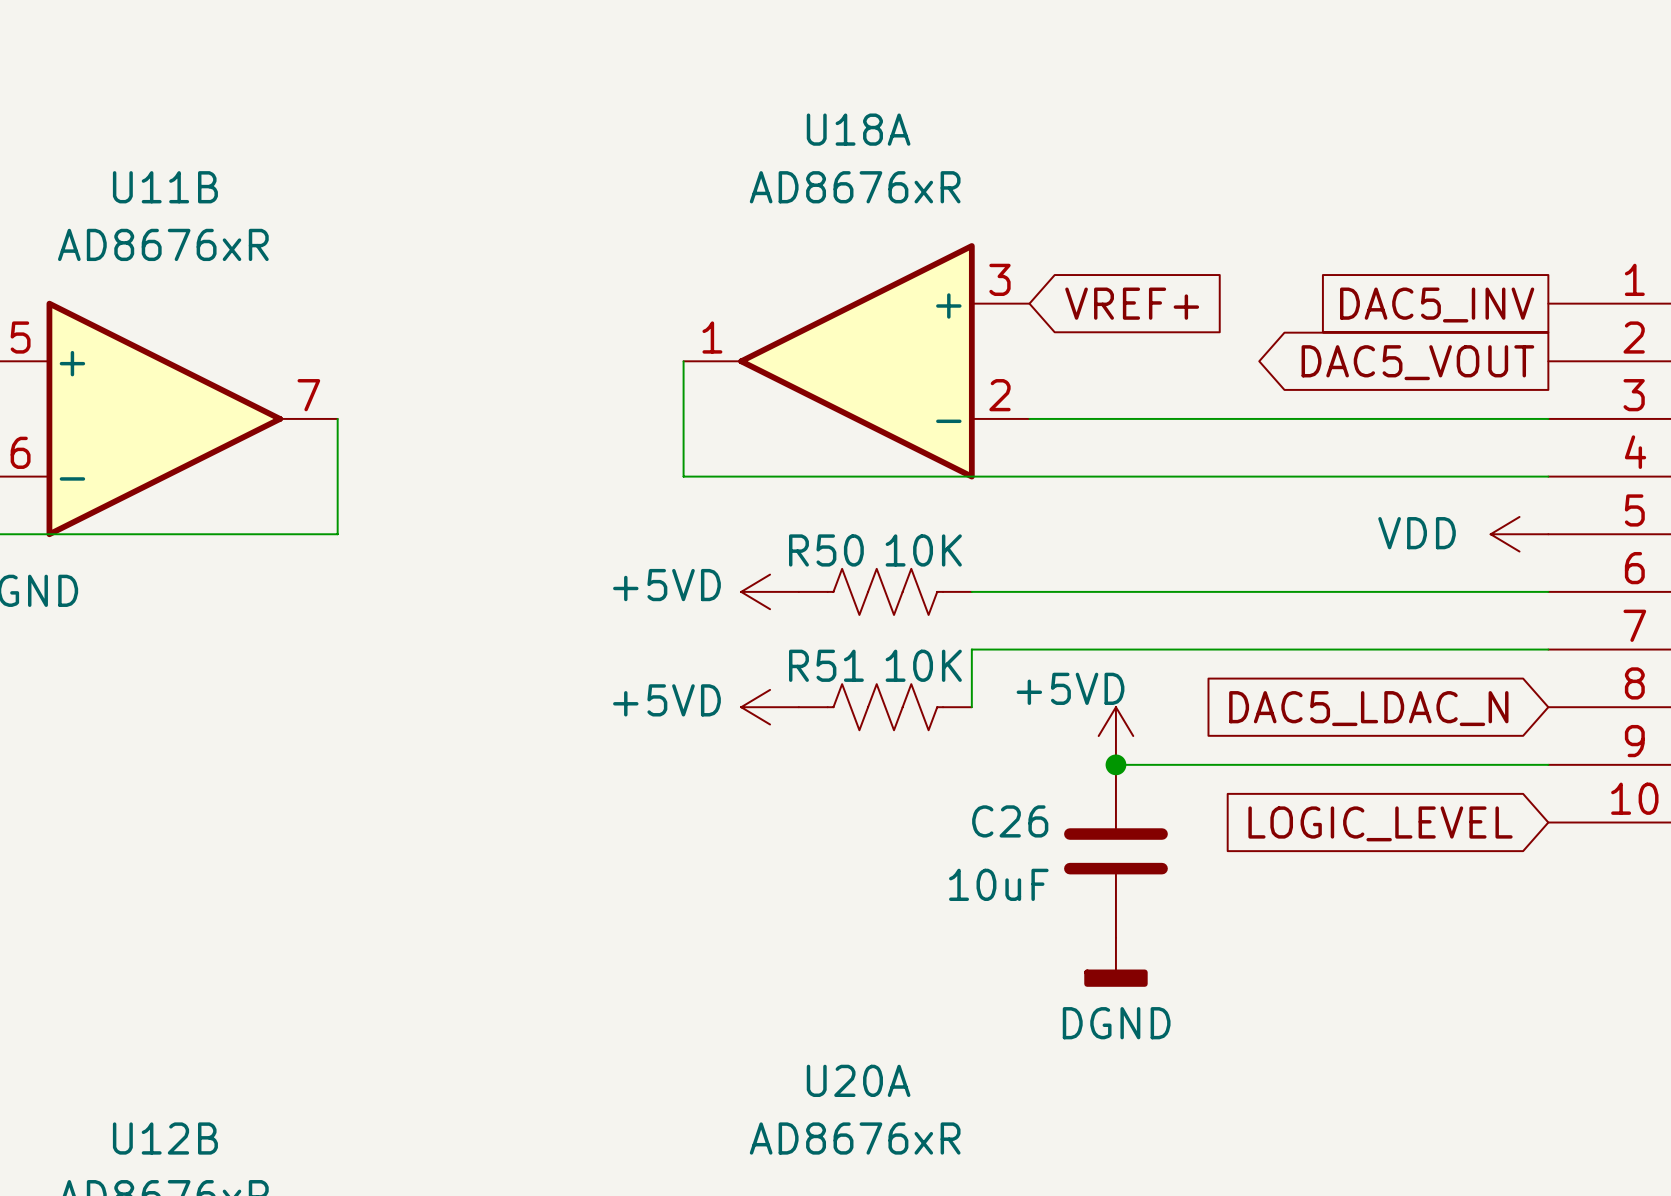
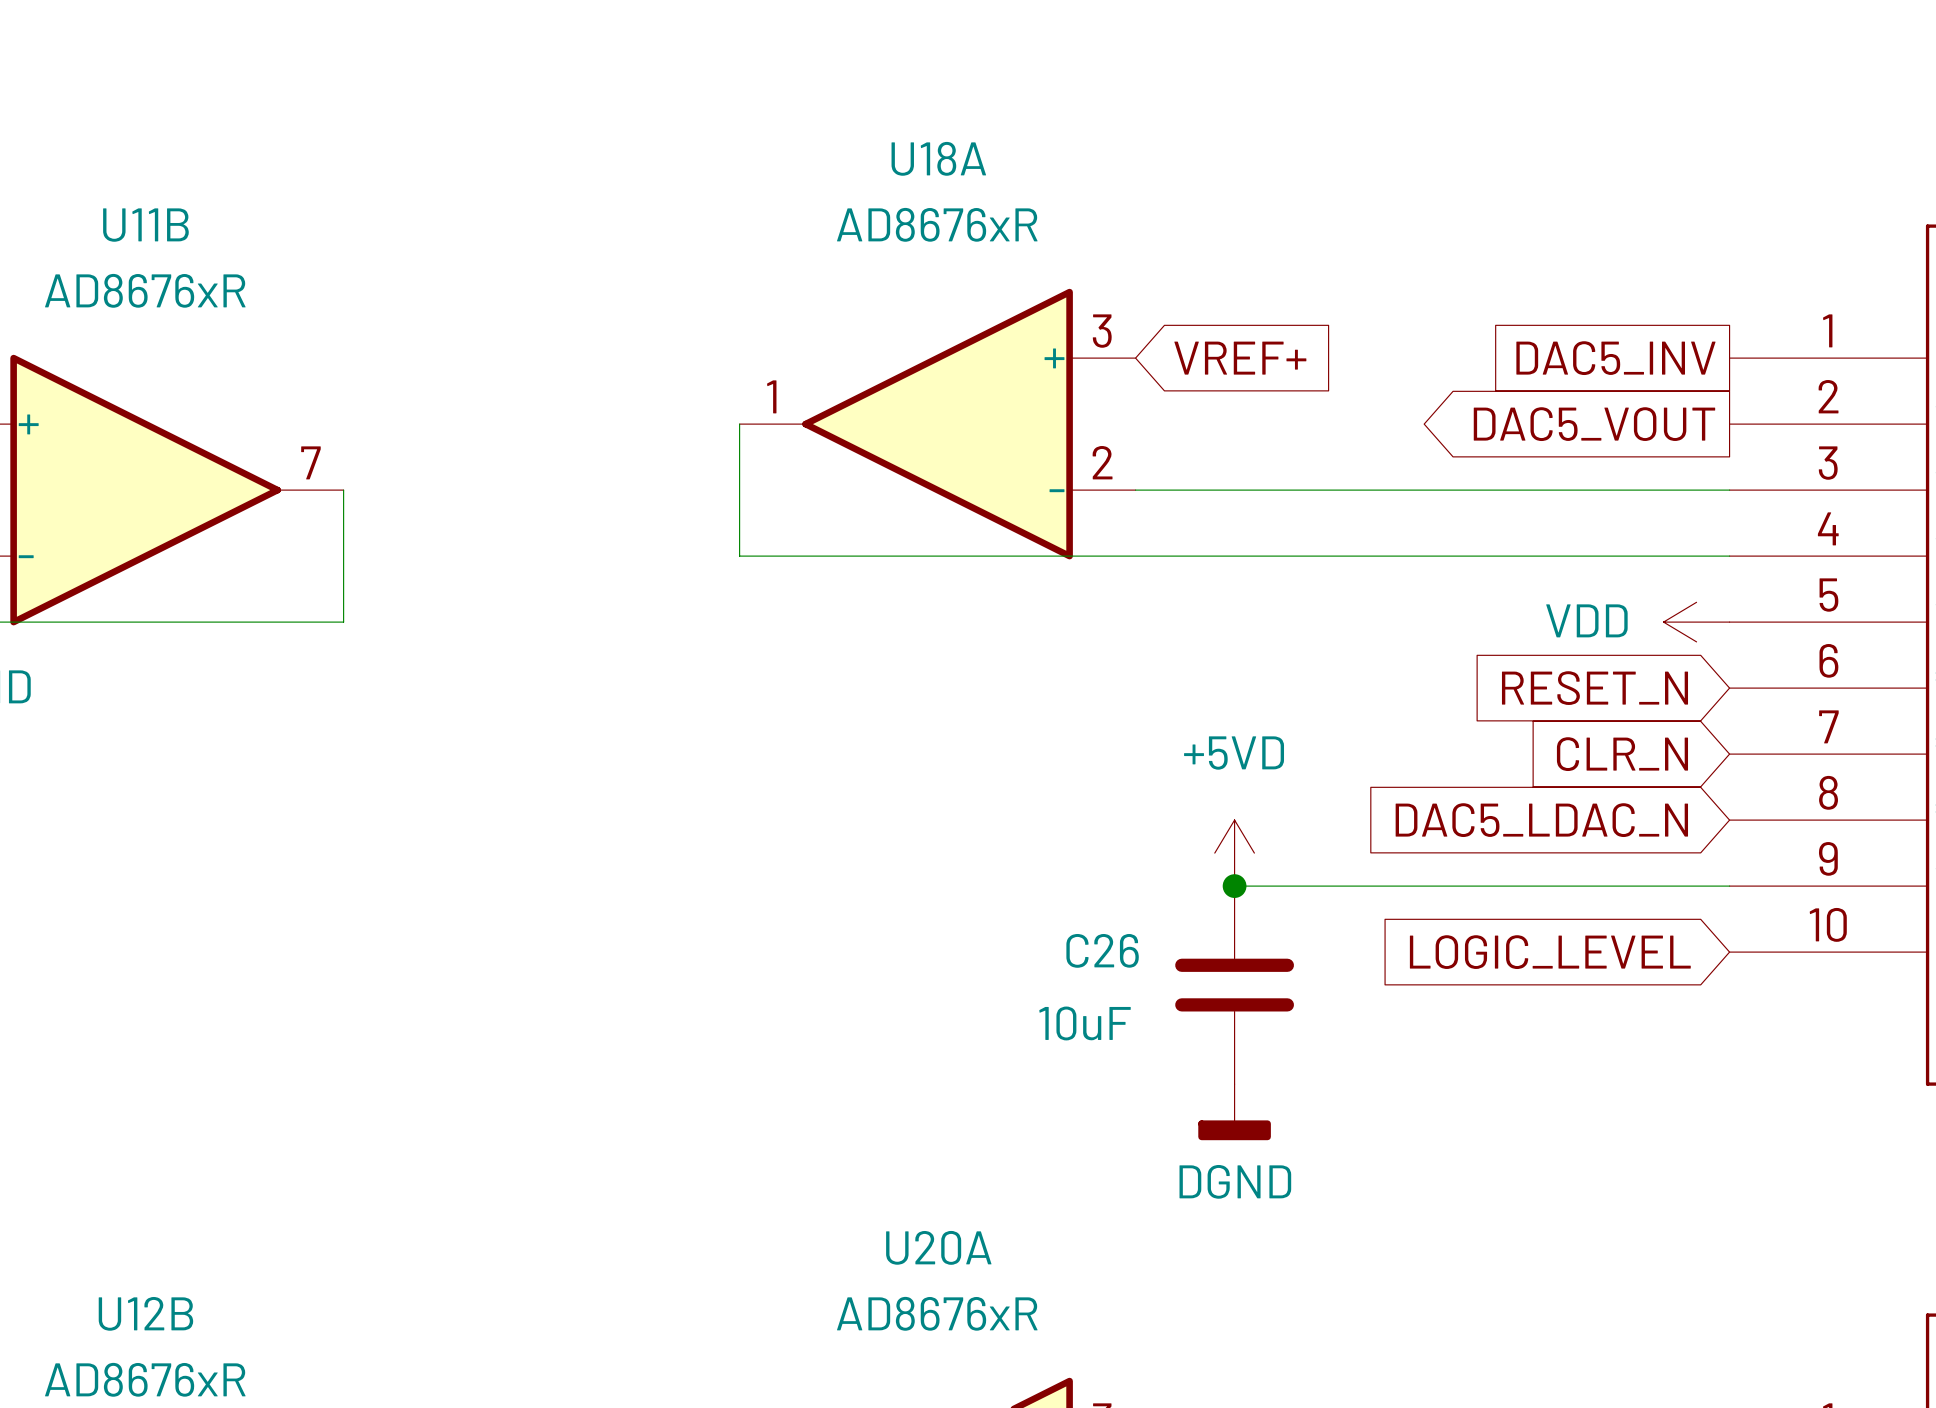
power symbol: +5VD (770, 591) -> none
R50: 10K (885, 591) -> none
wire: (971, 591) (1548, 591) -> none
global label: none -> RESET_N (1594, 688)
wire: (1548, 649) (971, 649) (971, 707) -> none
global label: none -> CLR_N (1622, 754)
power symbol text position: +5VD (1070, 688) -> +5VD (1234, 753)
power symbol: +5VD (770, 707) -> none
R51: 10K (885, 707) -> none

